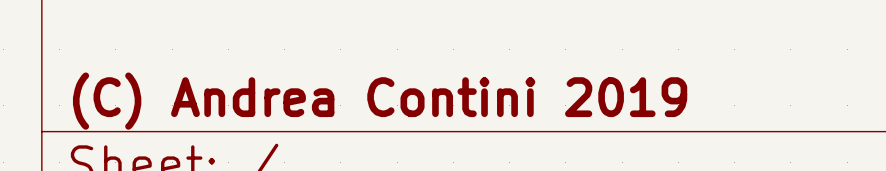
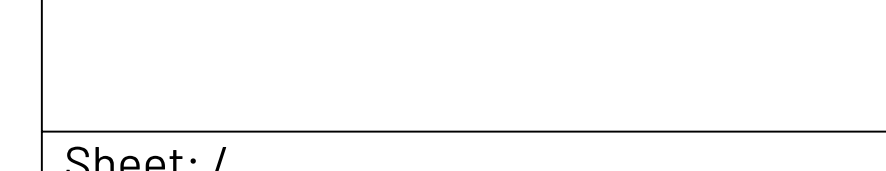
title block: (C) Andrea Contini 2019 (380, 101) -> none

